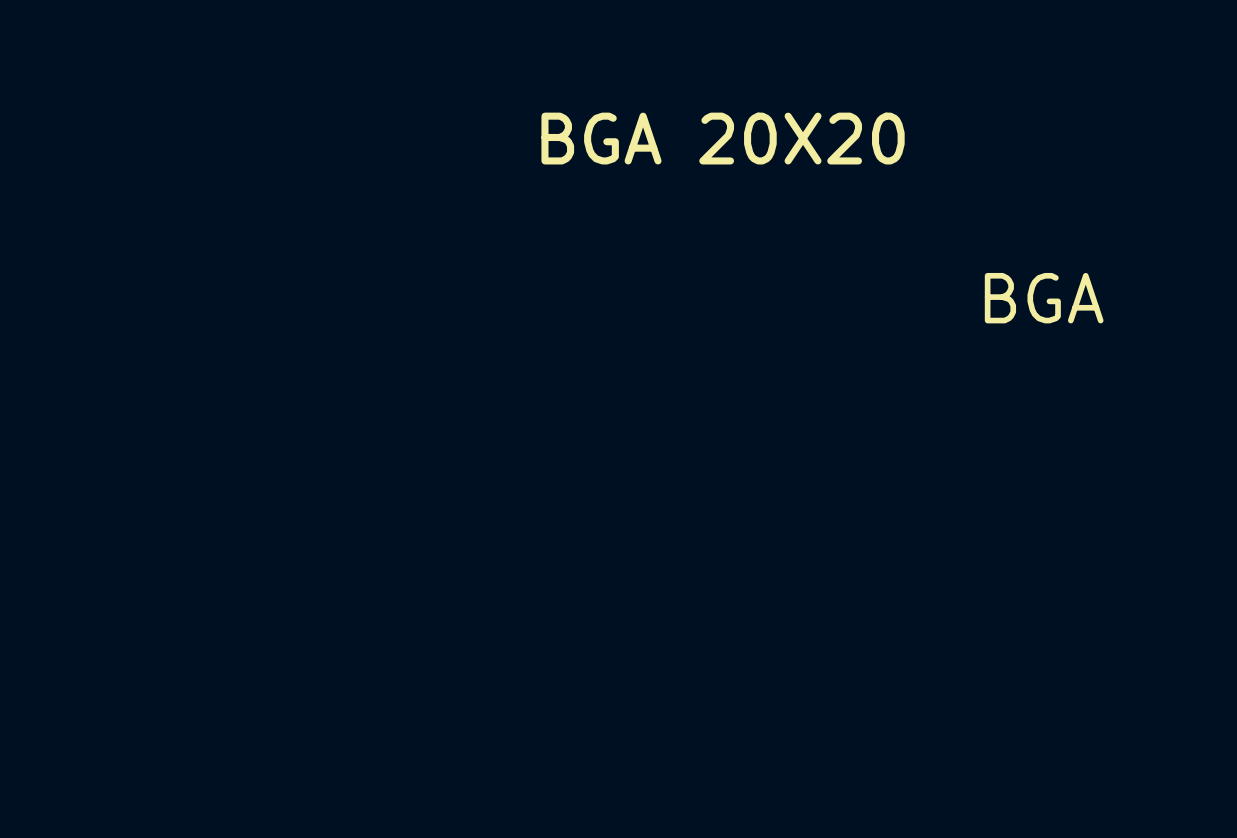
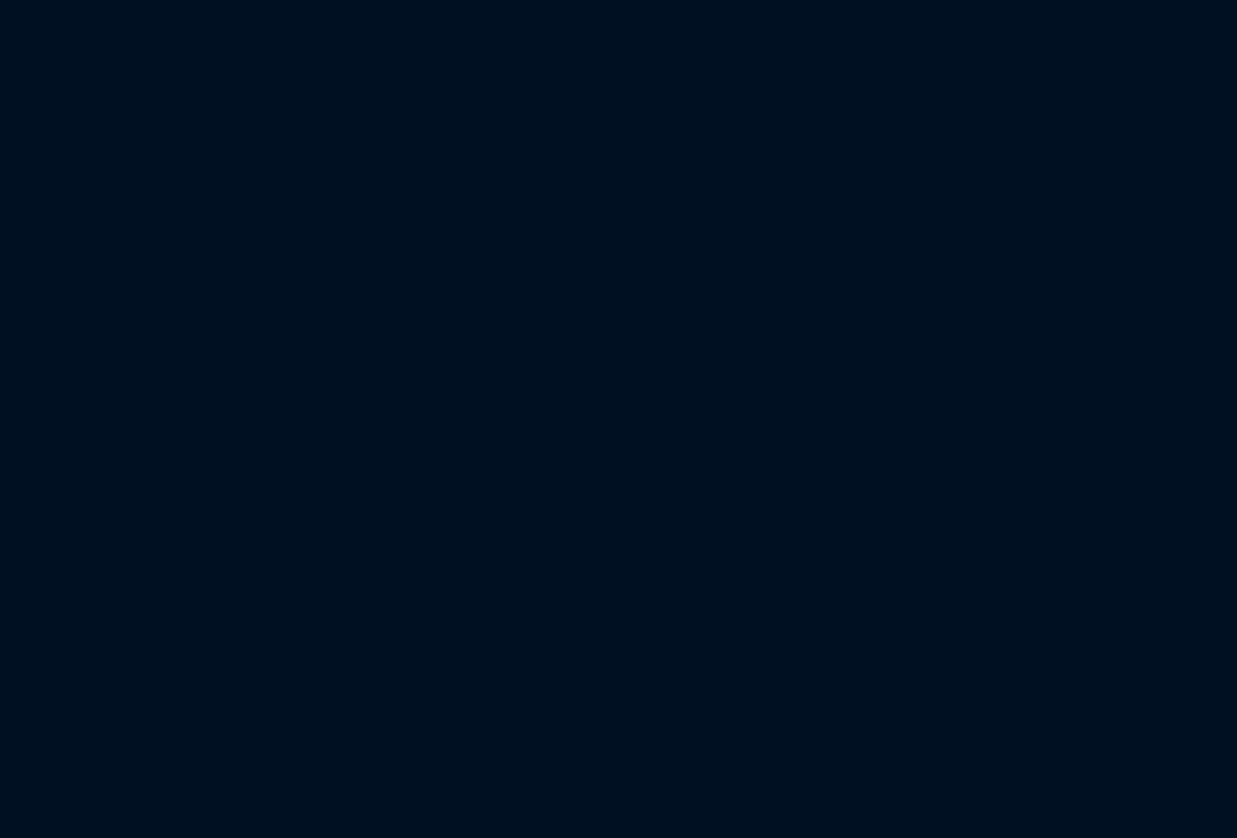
text: BGA 20X20 (723, 138) -> none
text: BGA (1044, 298) -> none

